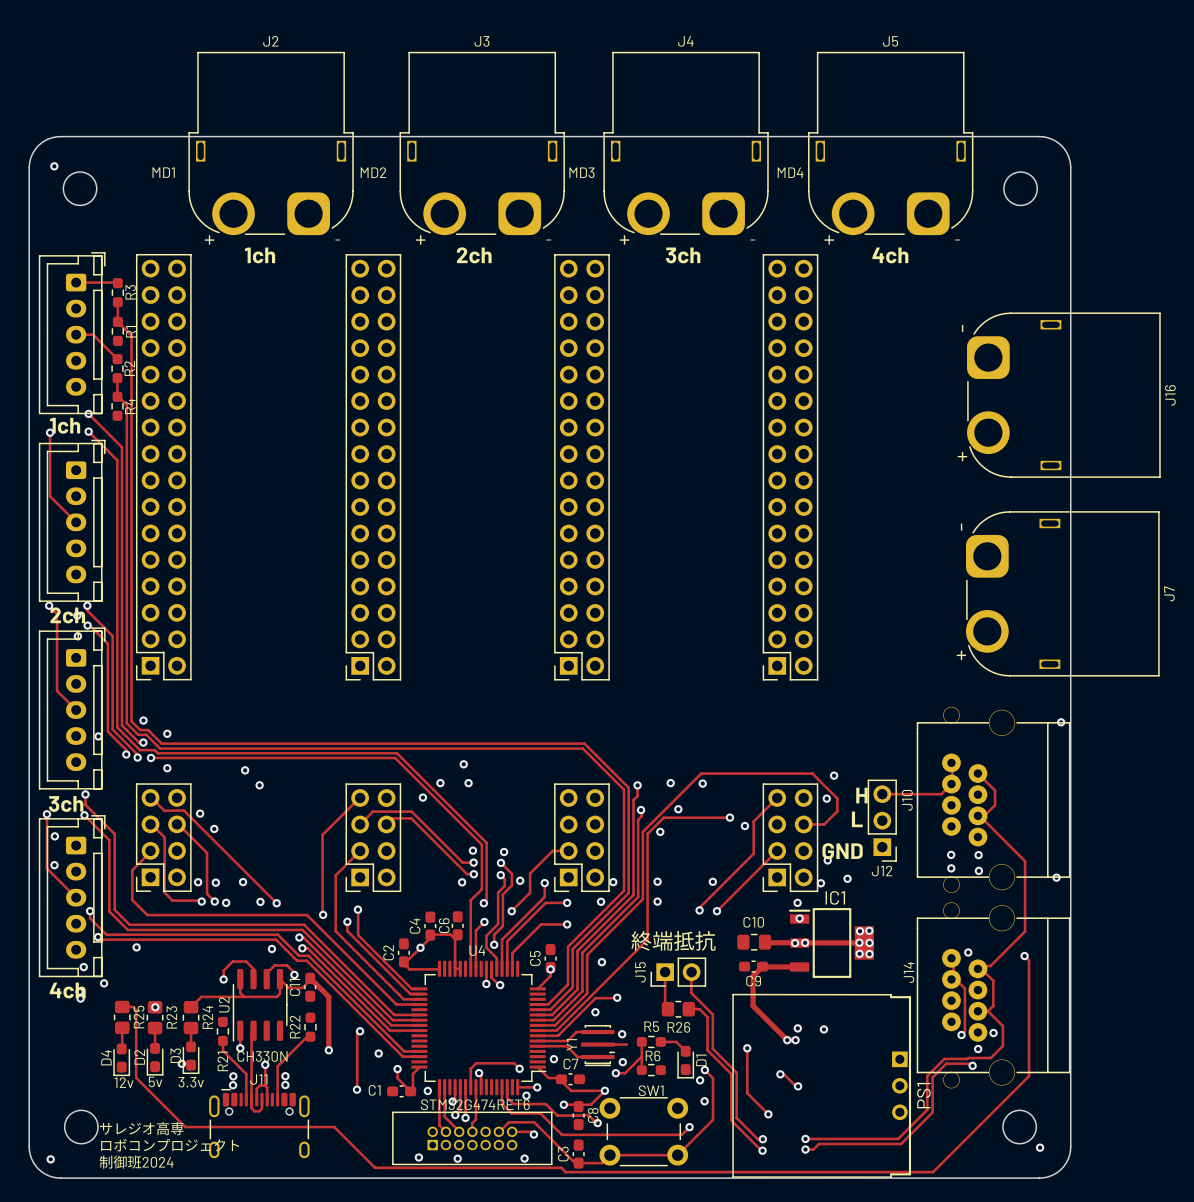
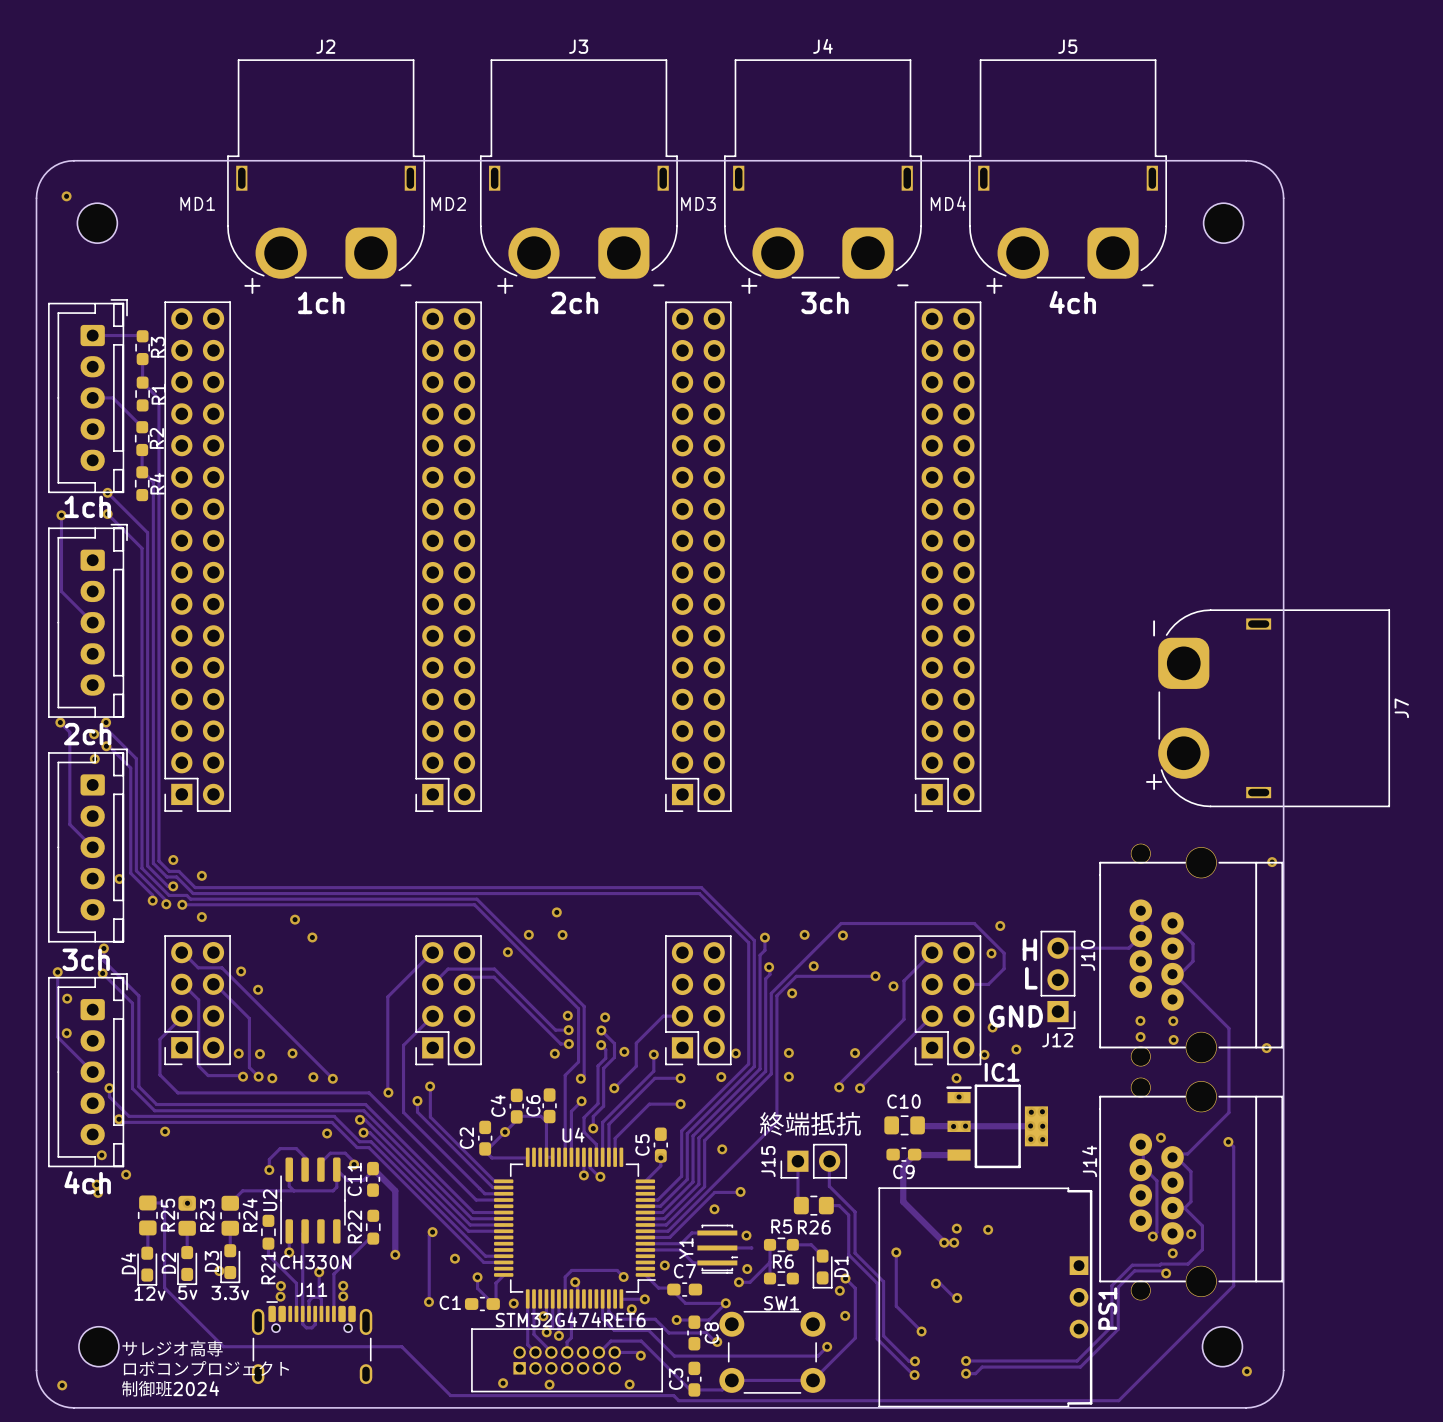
J16: (1063, 395) -> none

